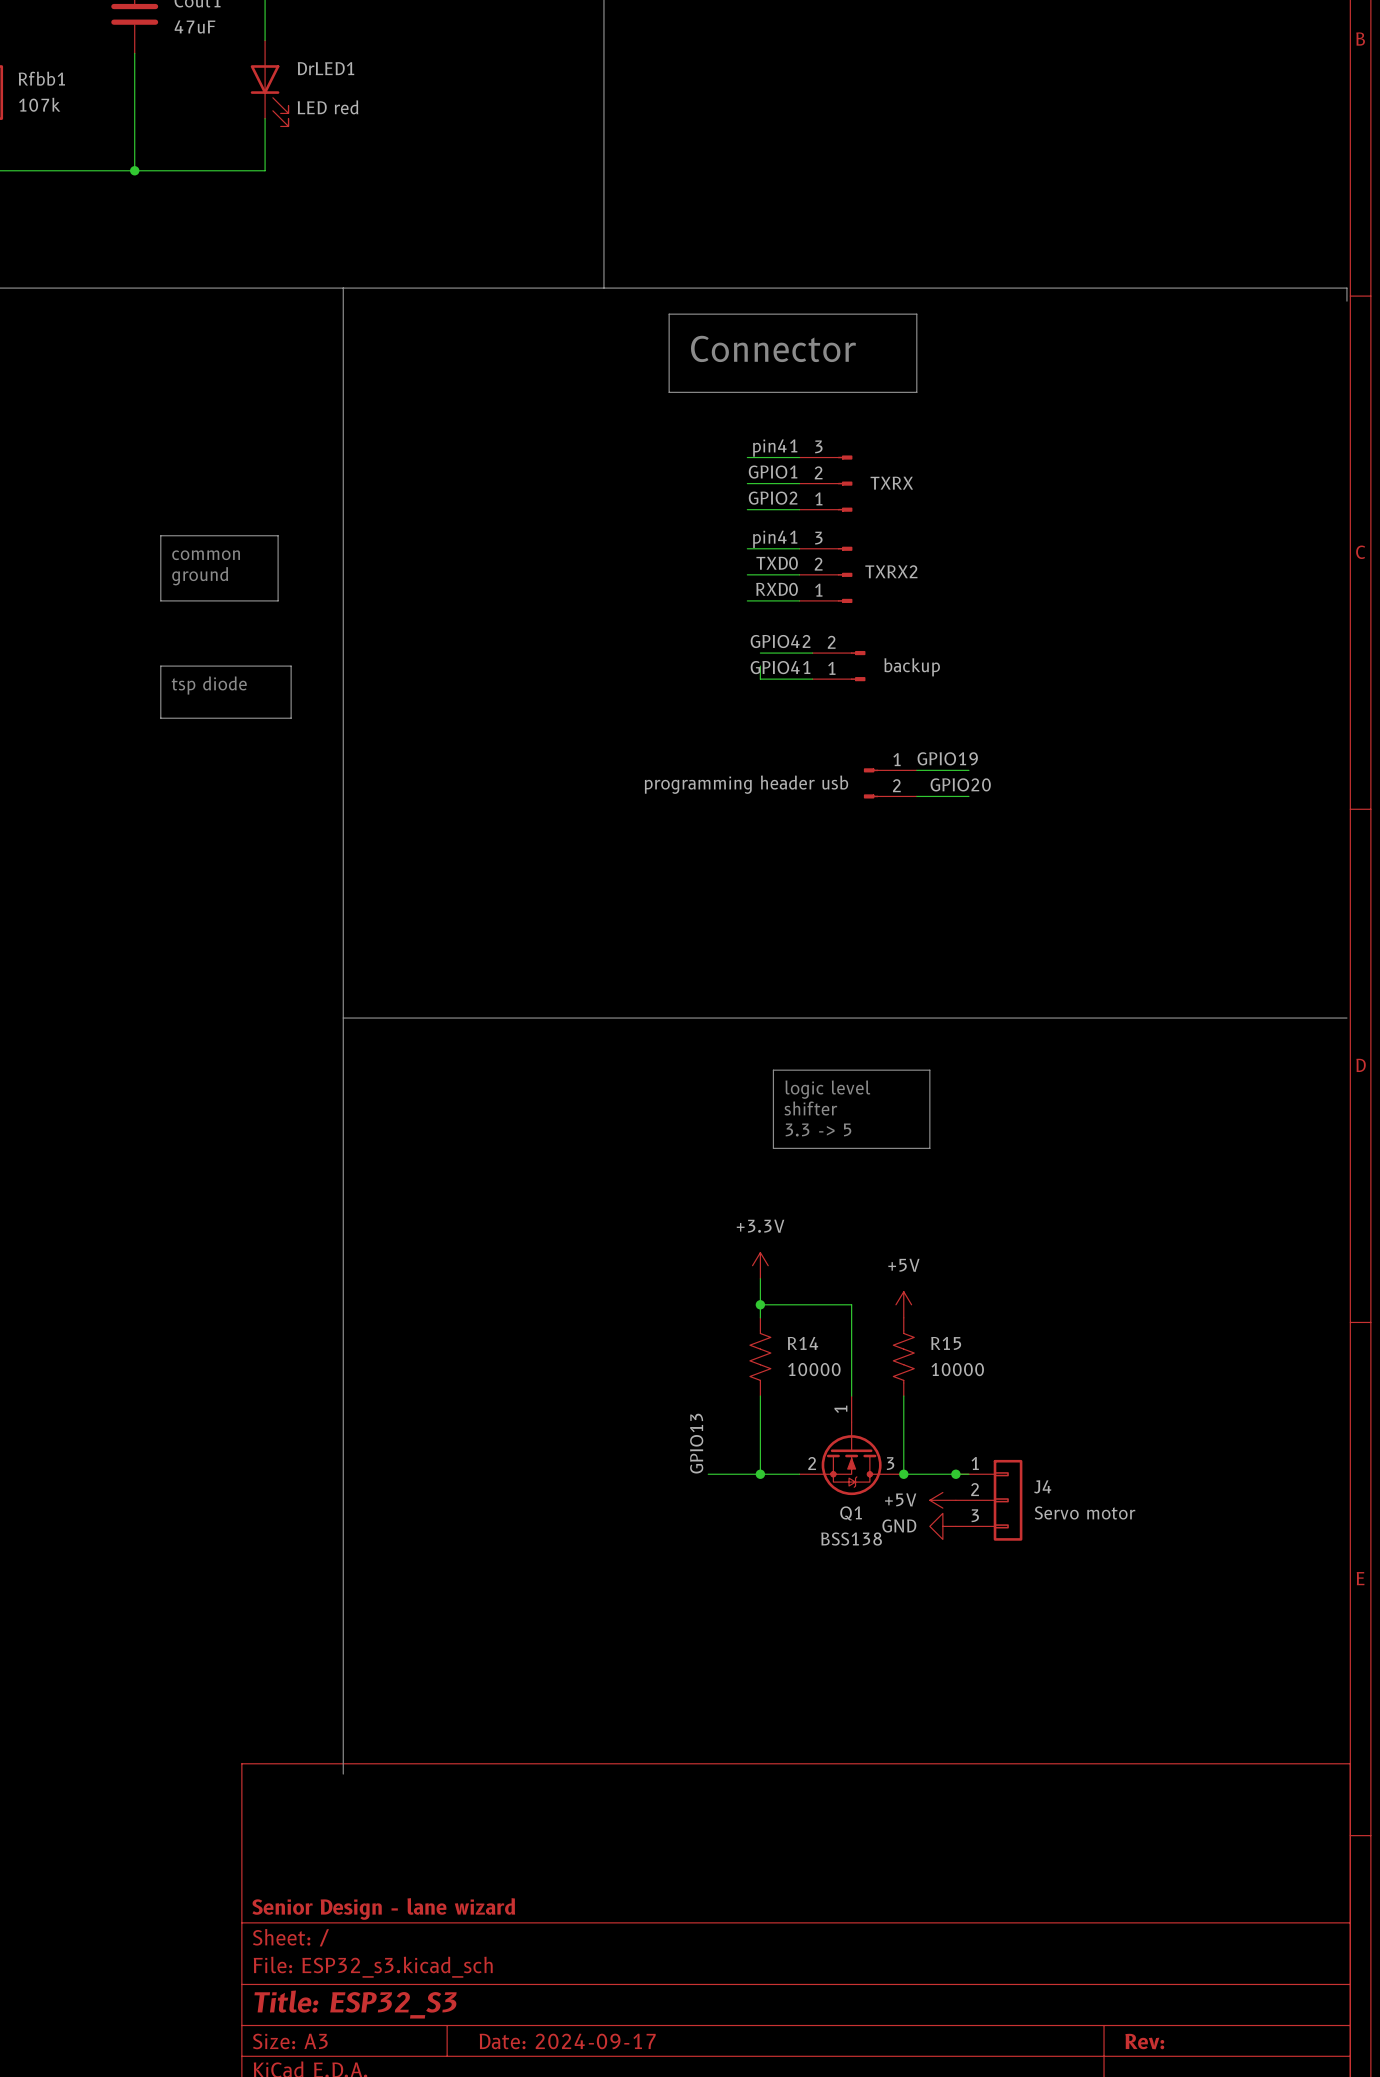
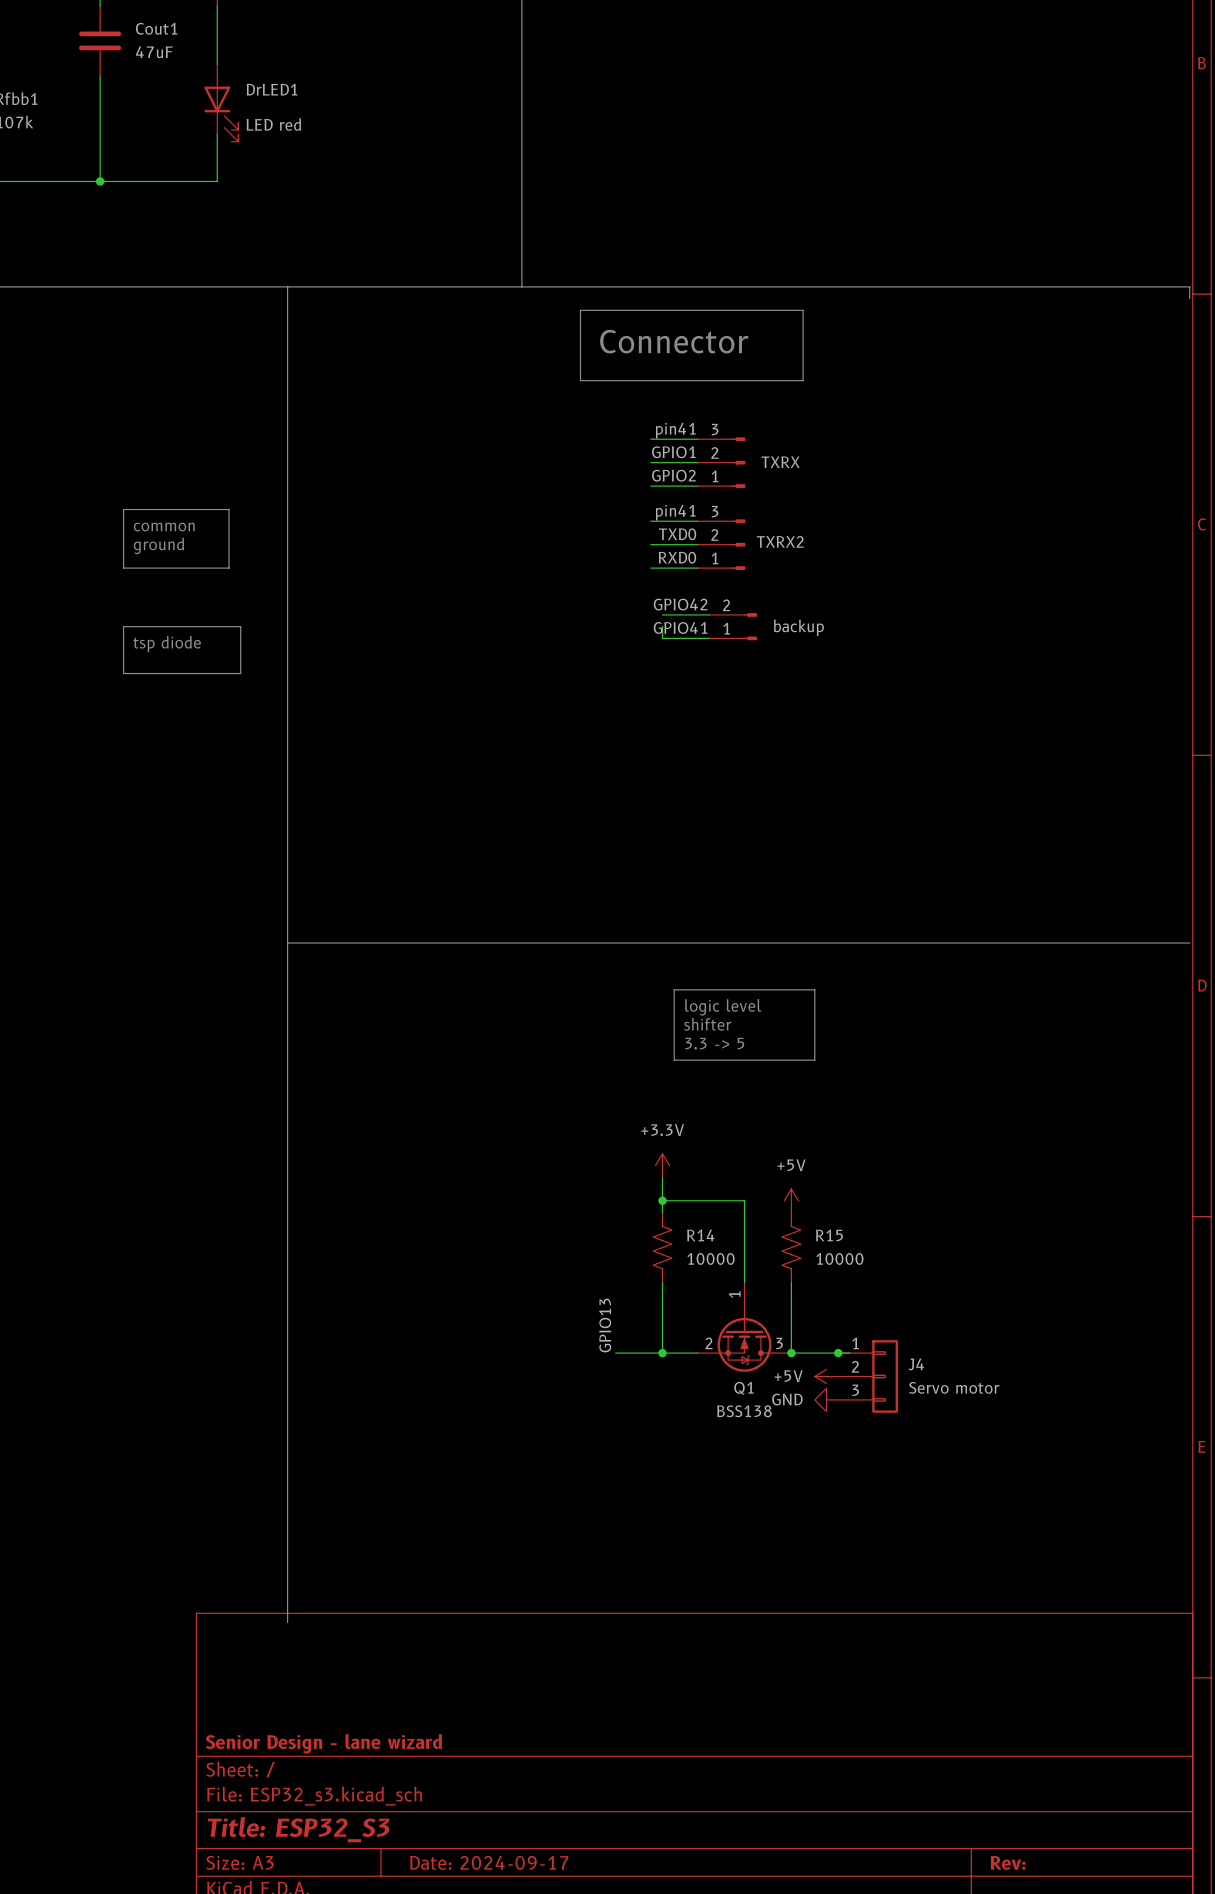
label: GPIO19 (947, 758) -> none
wire: (916, 770) (968, 770) -> none
part: programming header usb (890, 783) -> none
label: GPIO20 (960, 784) -> none
wire: (916, 796) (968, 796) -> none

